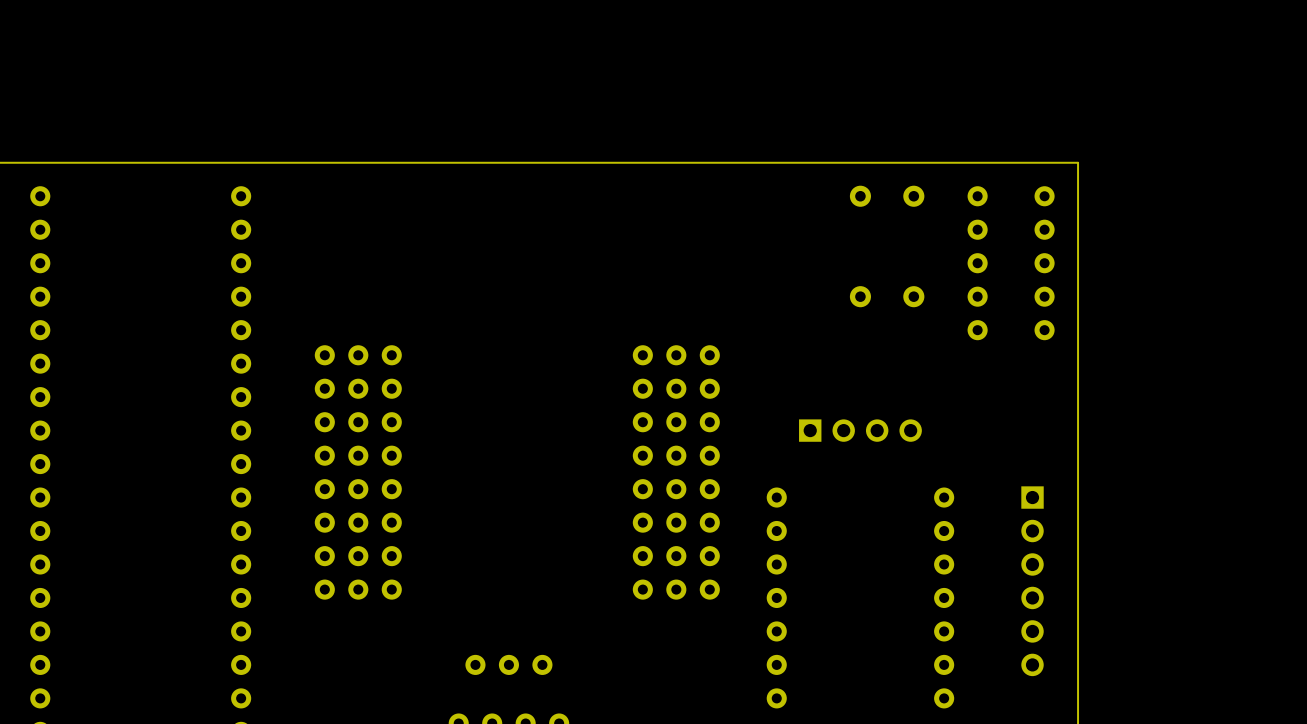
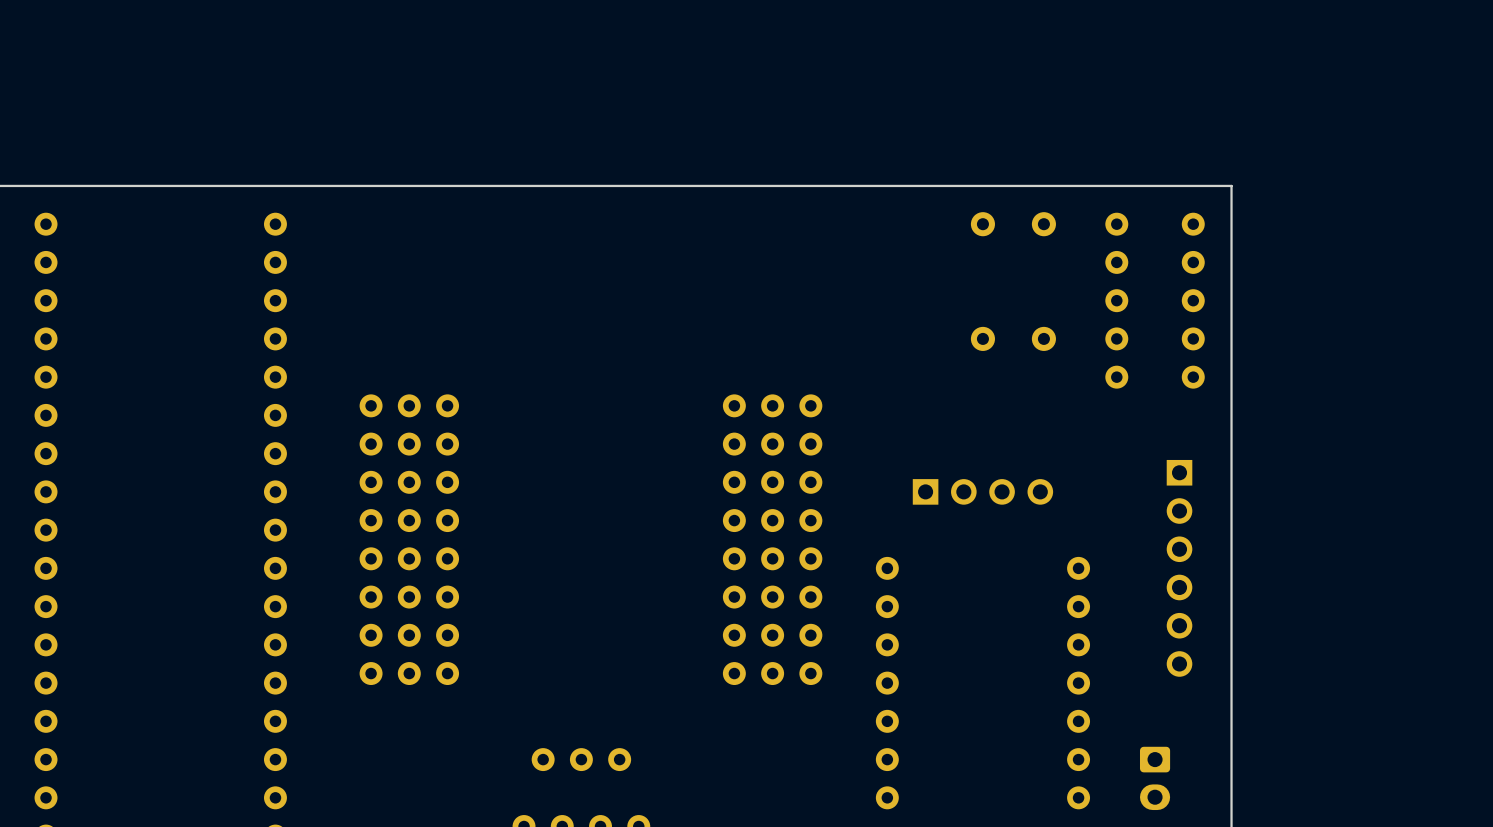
part position: (1032, 581) -> (1179, 568)
part: none -> (1155, 778)

